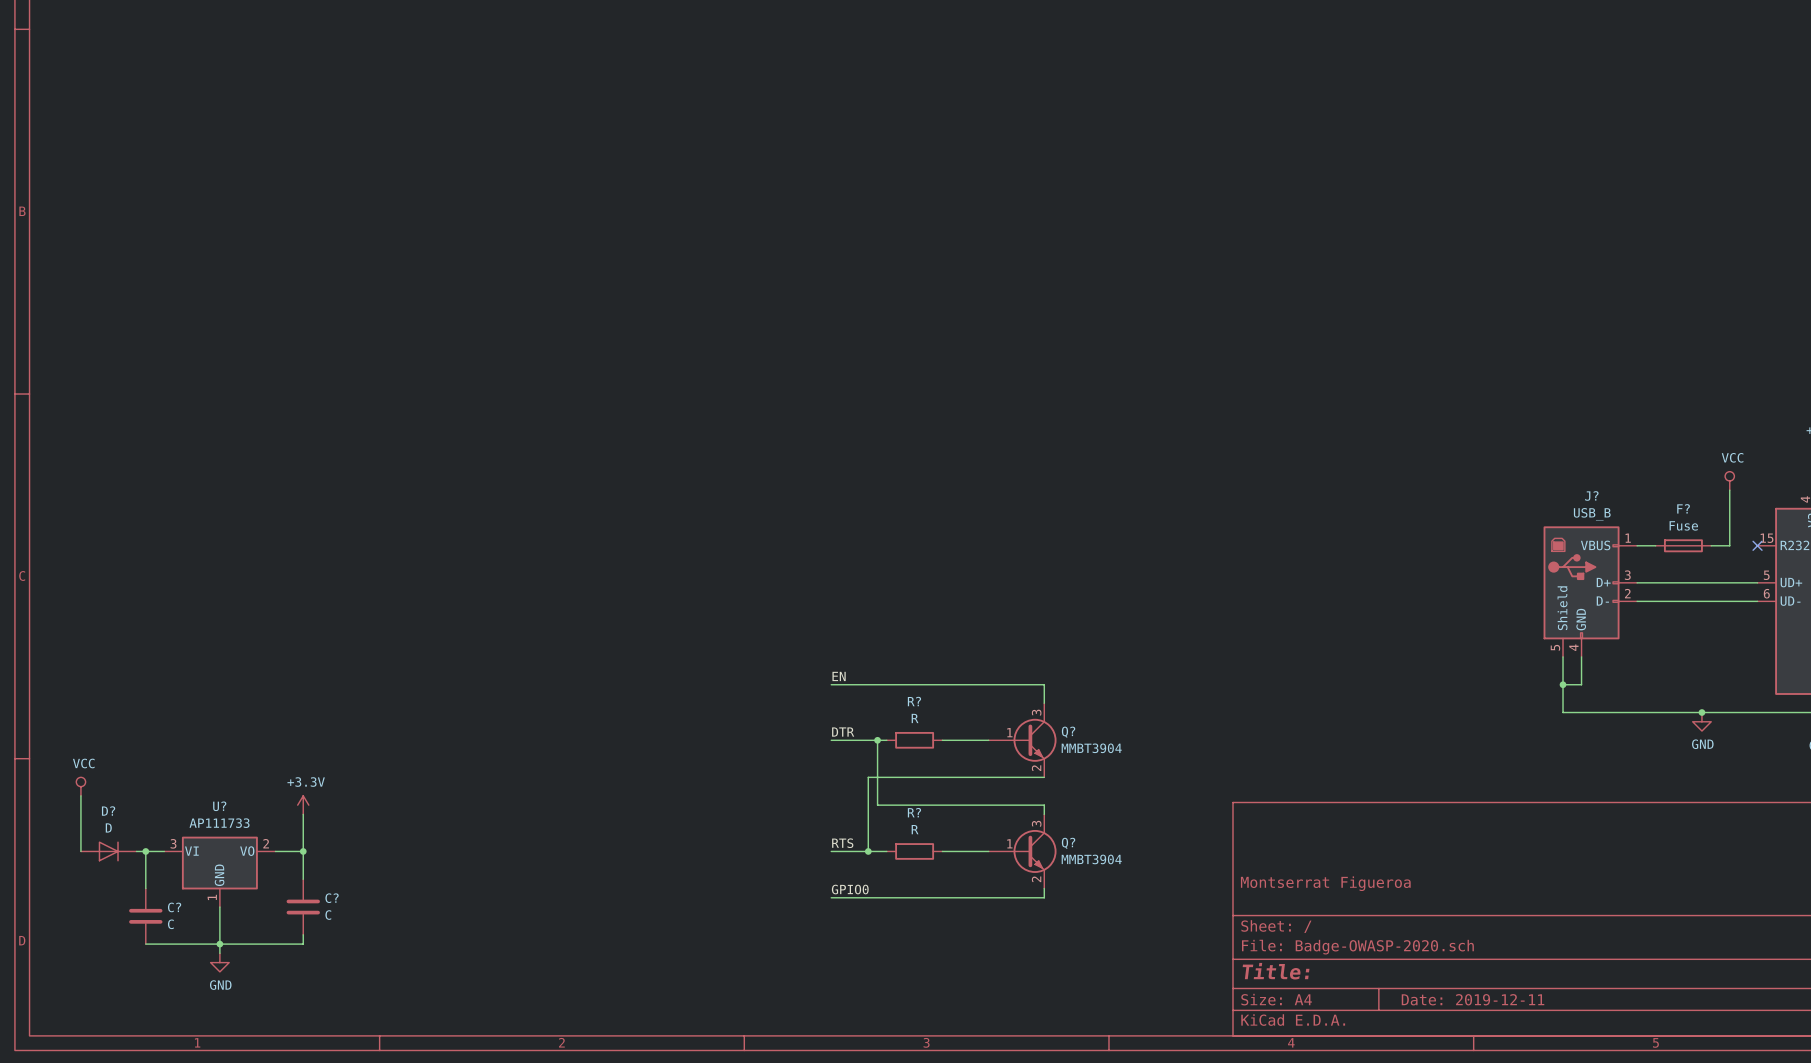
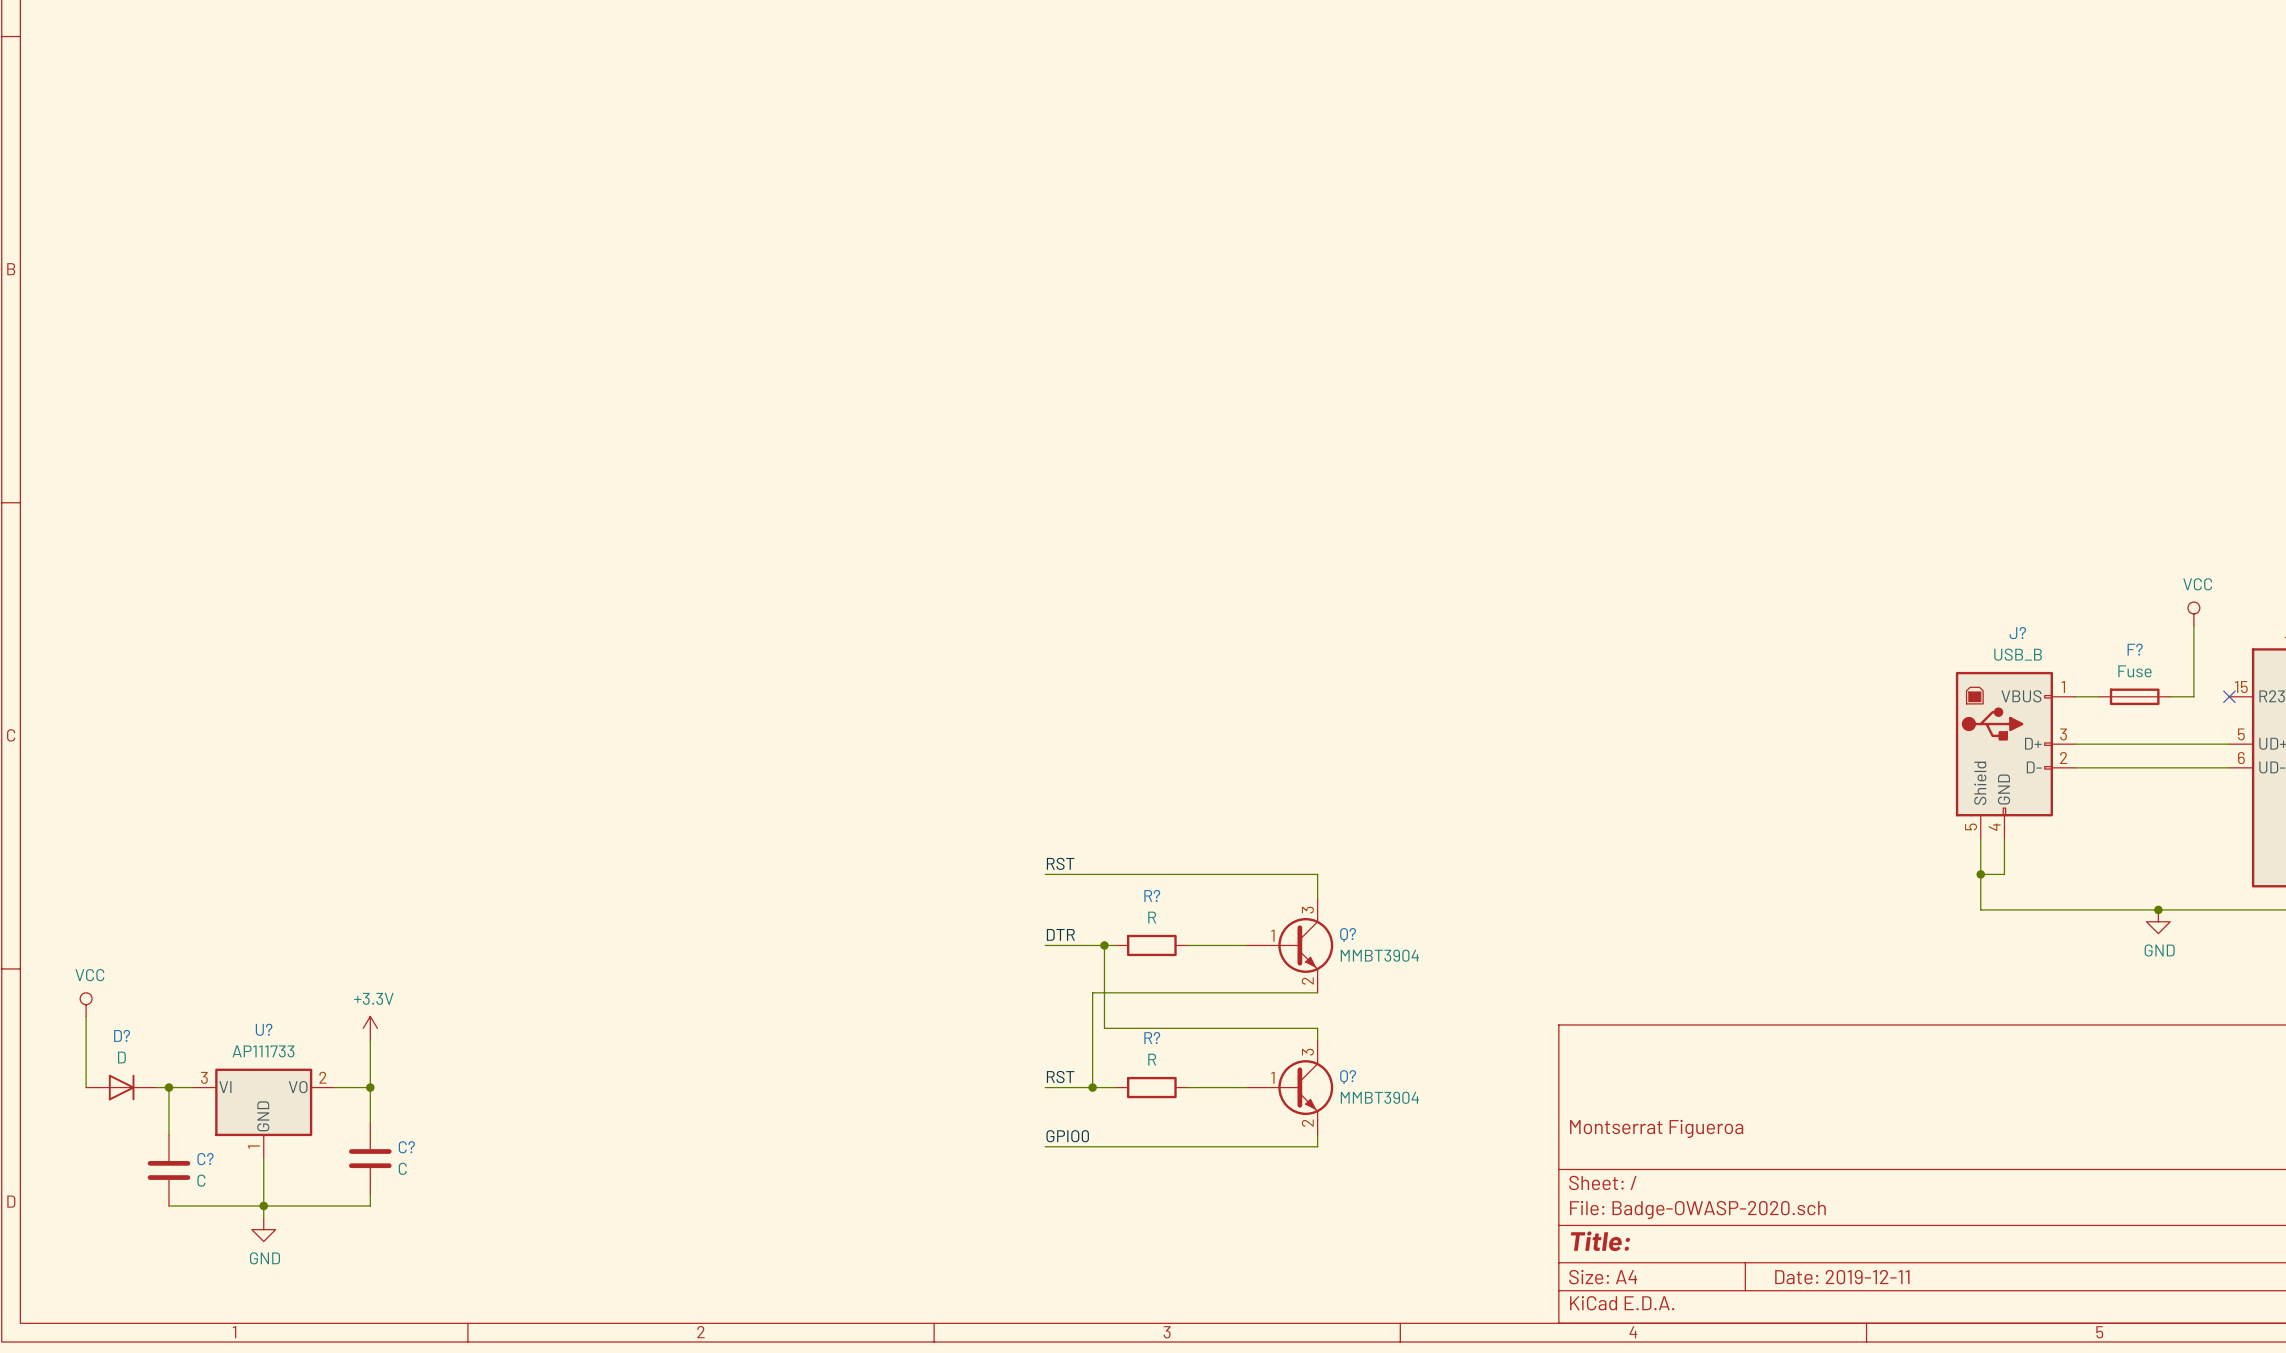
label: EN (839, 676) -> RST (1060, 863)
label: RTS (842, 843) -> RST (1060, 1076)

